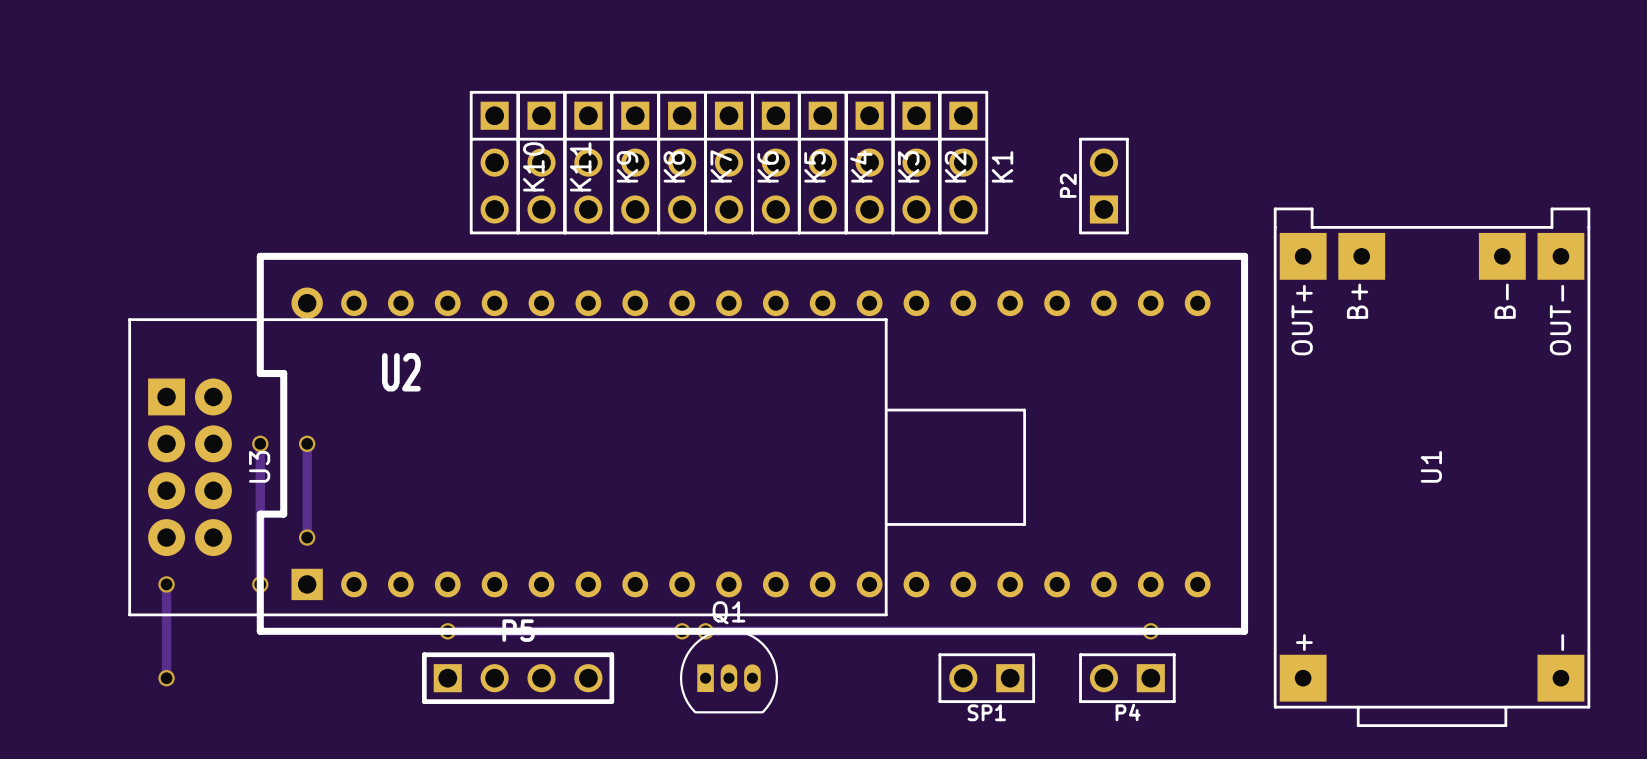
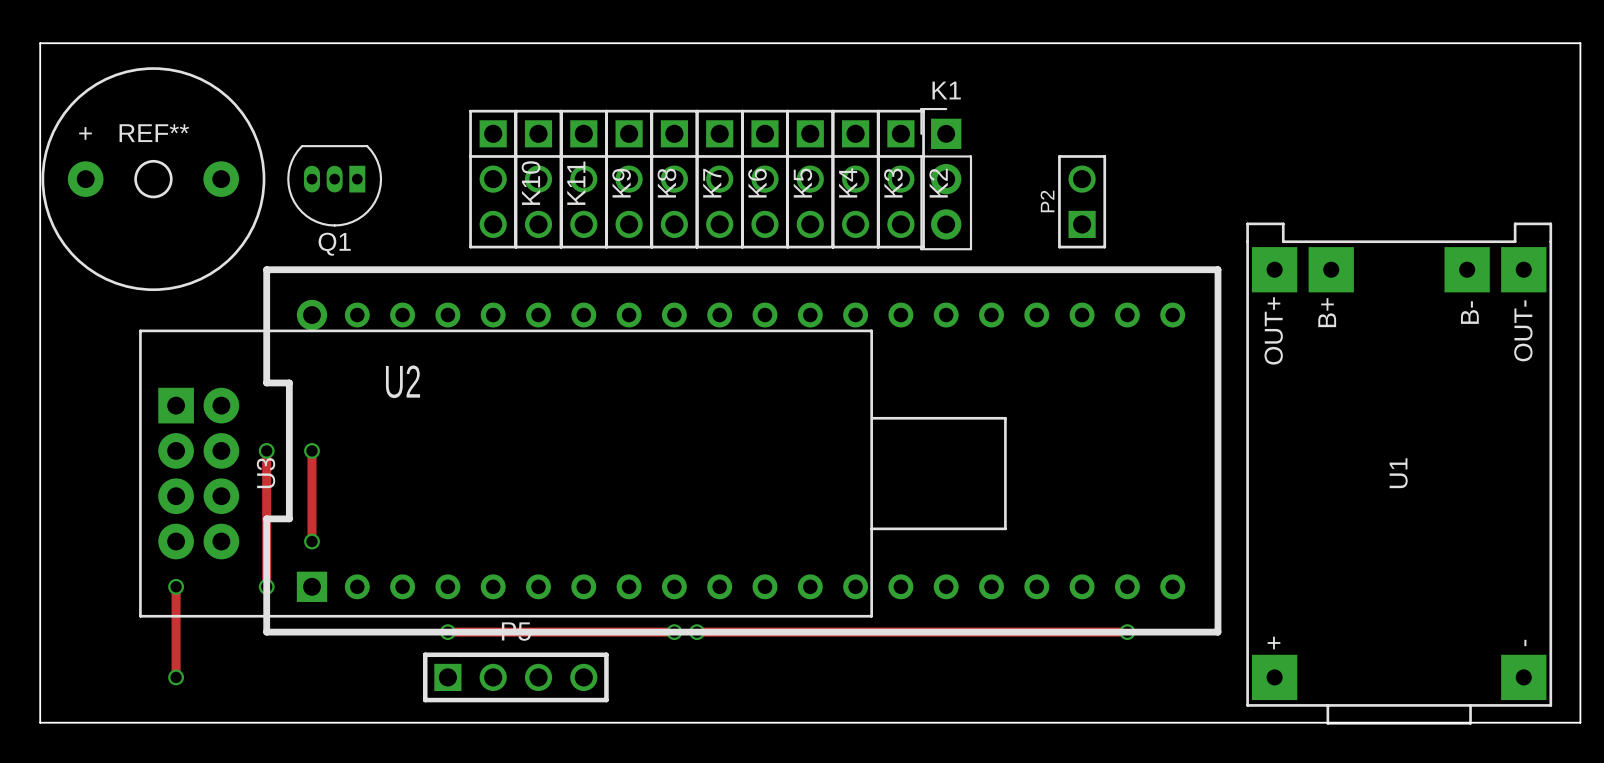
board edge: none -> (40, 43) (40, 722) (1580, 722) (1580, 43) (40, 43)
K1 footprint: [938, 90, 989, 235] -> [920, 107, 973, 251]
REF**: none -> (153, 179)
K1 name position: K1 (1002, 166) -> K1 (946, 90)
Q1 rotation: 0° (728, 671) -> 180° (334, 185)
Q1 position: (728, 671) -> (334, 185)
SP1: (986, 678) -> none
P4: (1127, 678) -> none

